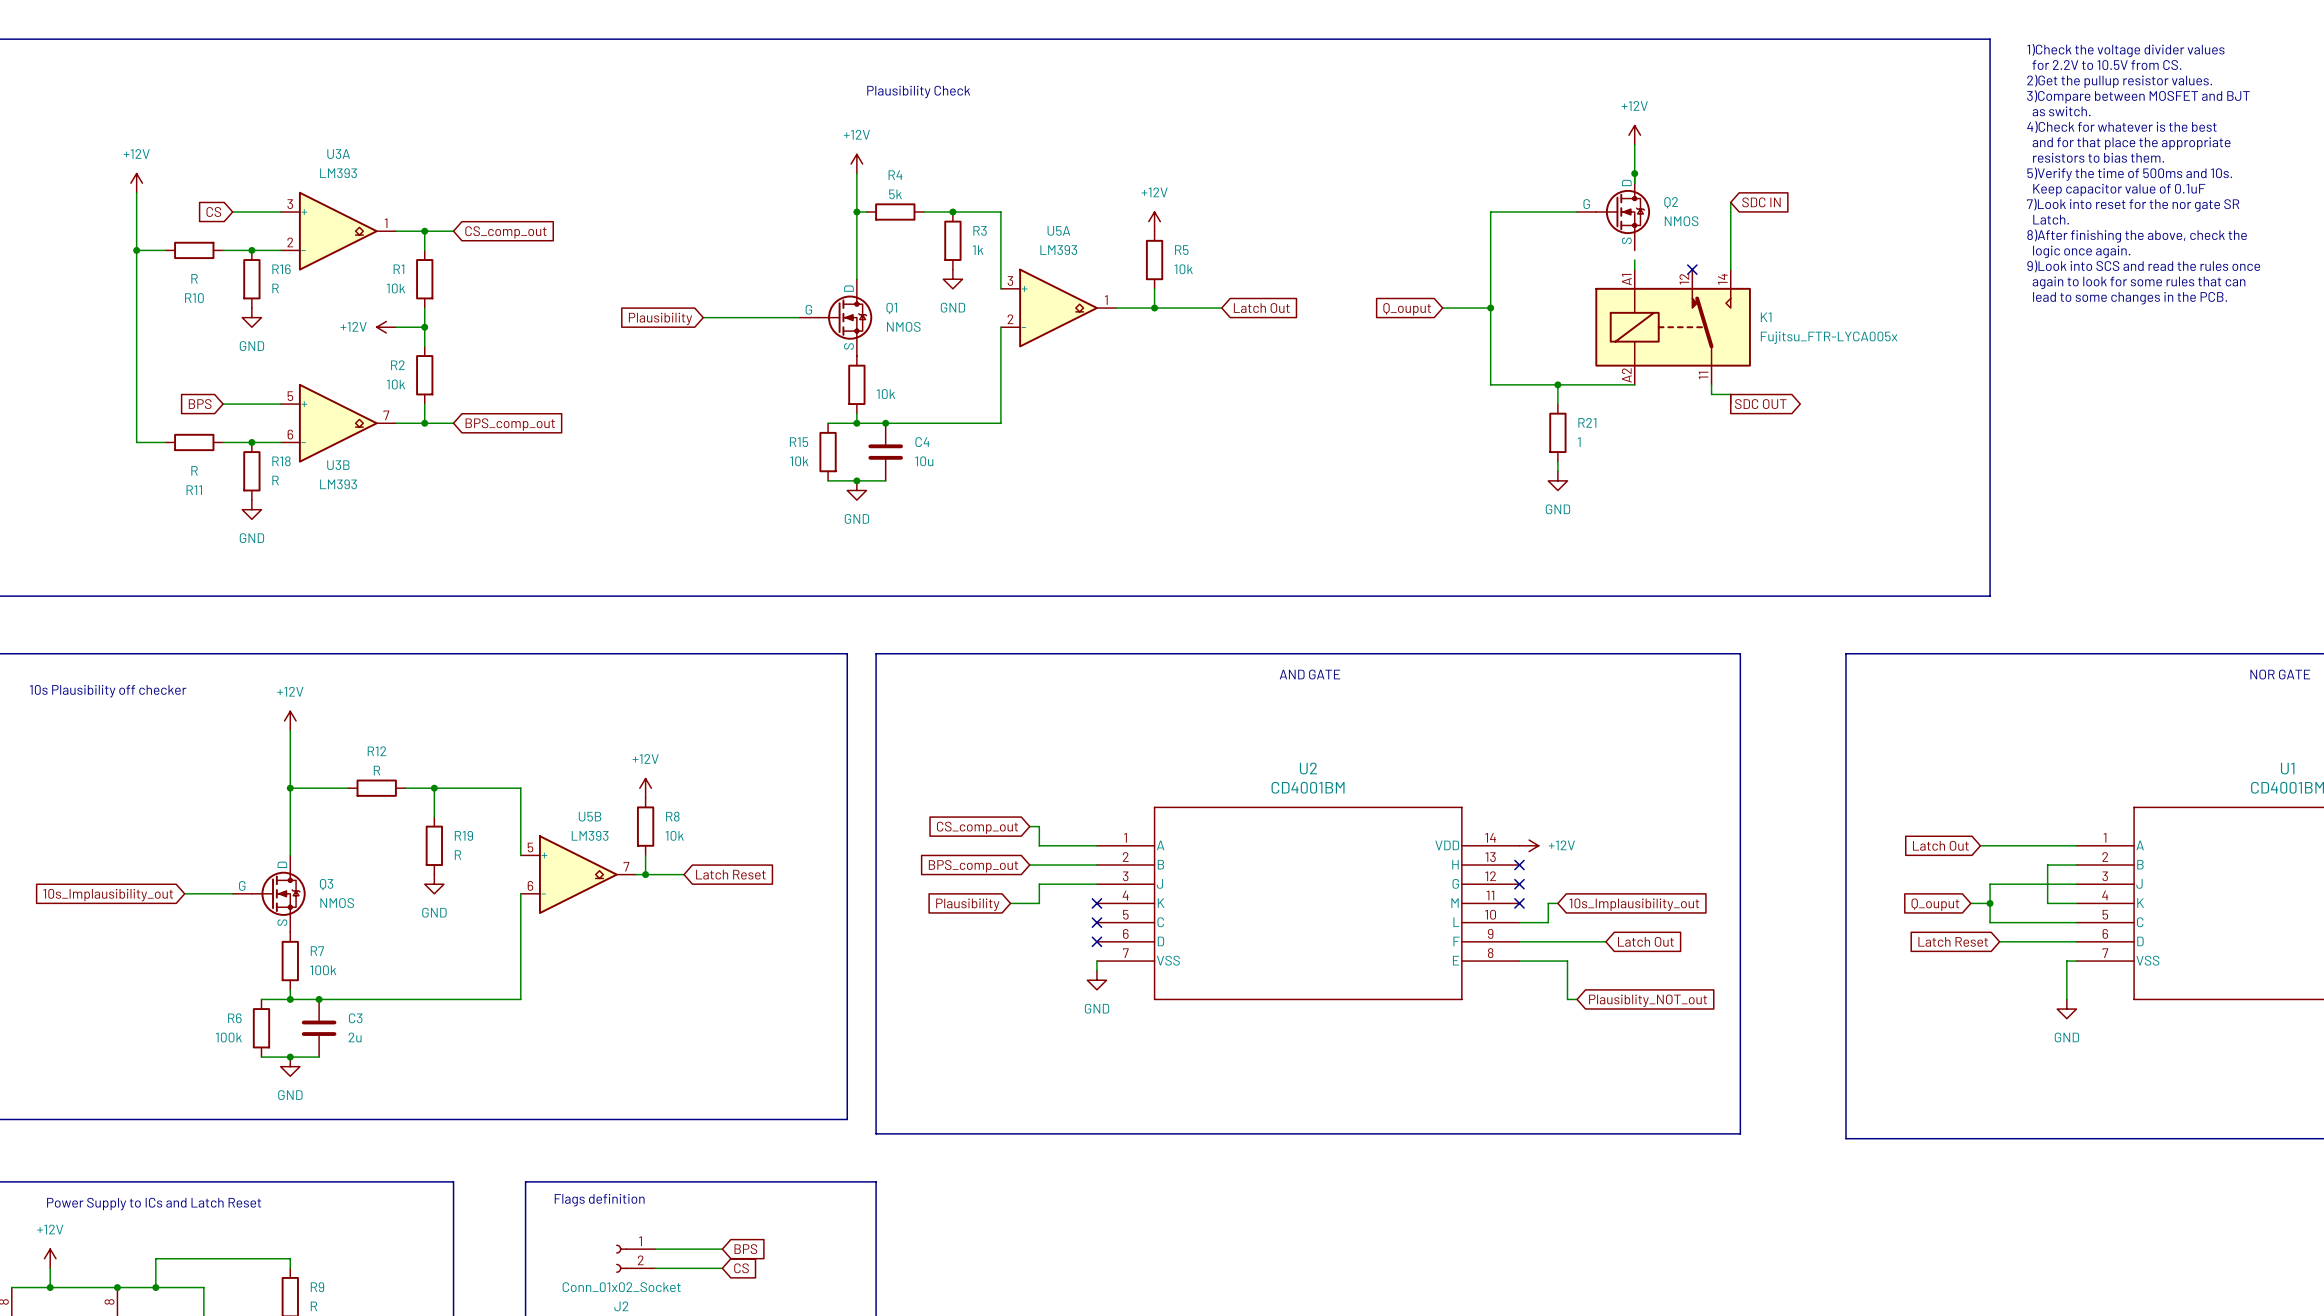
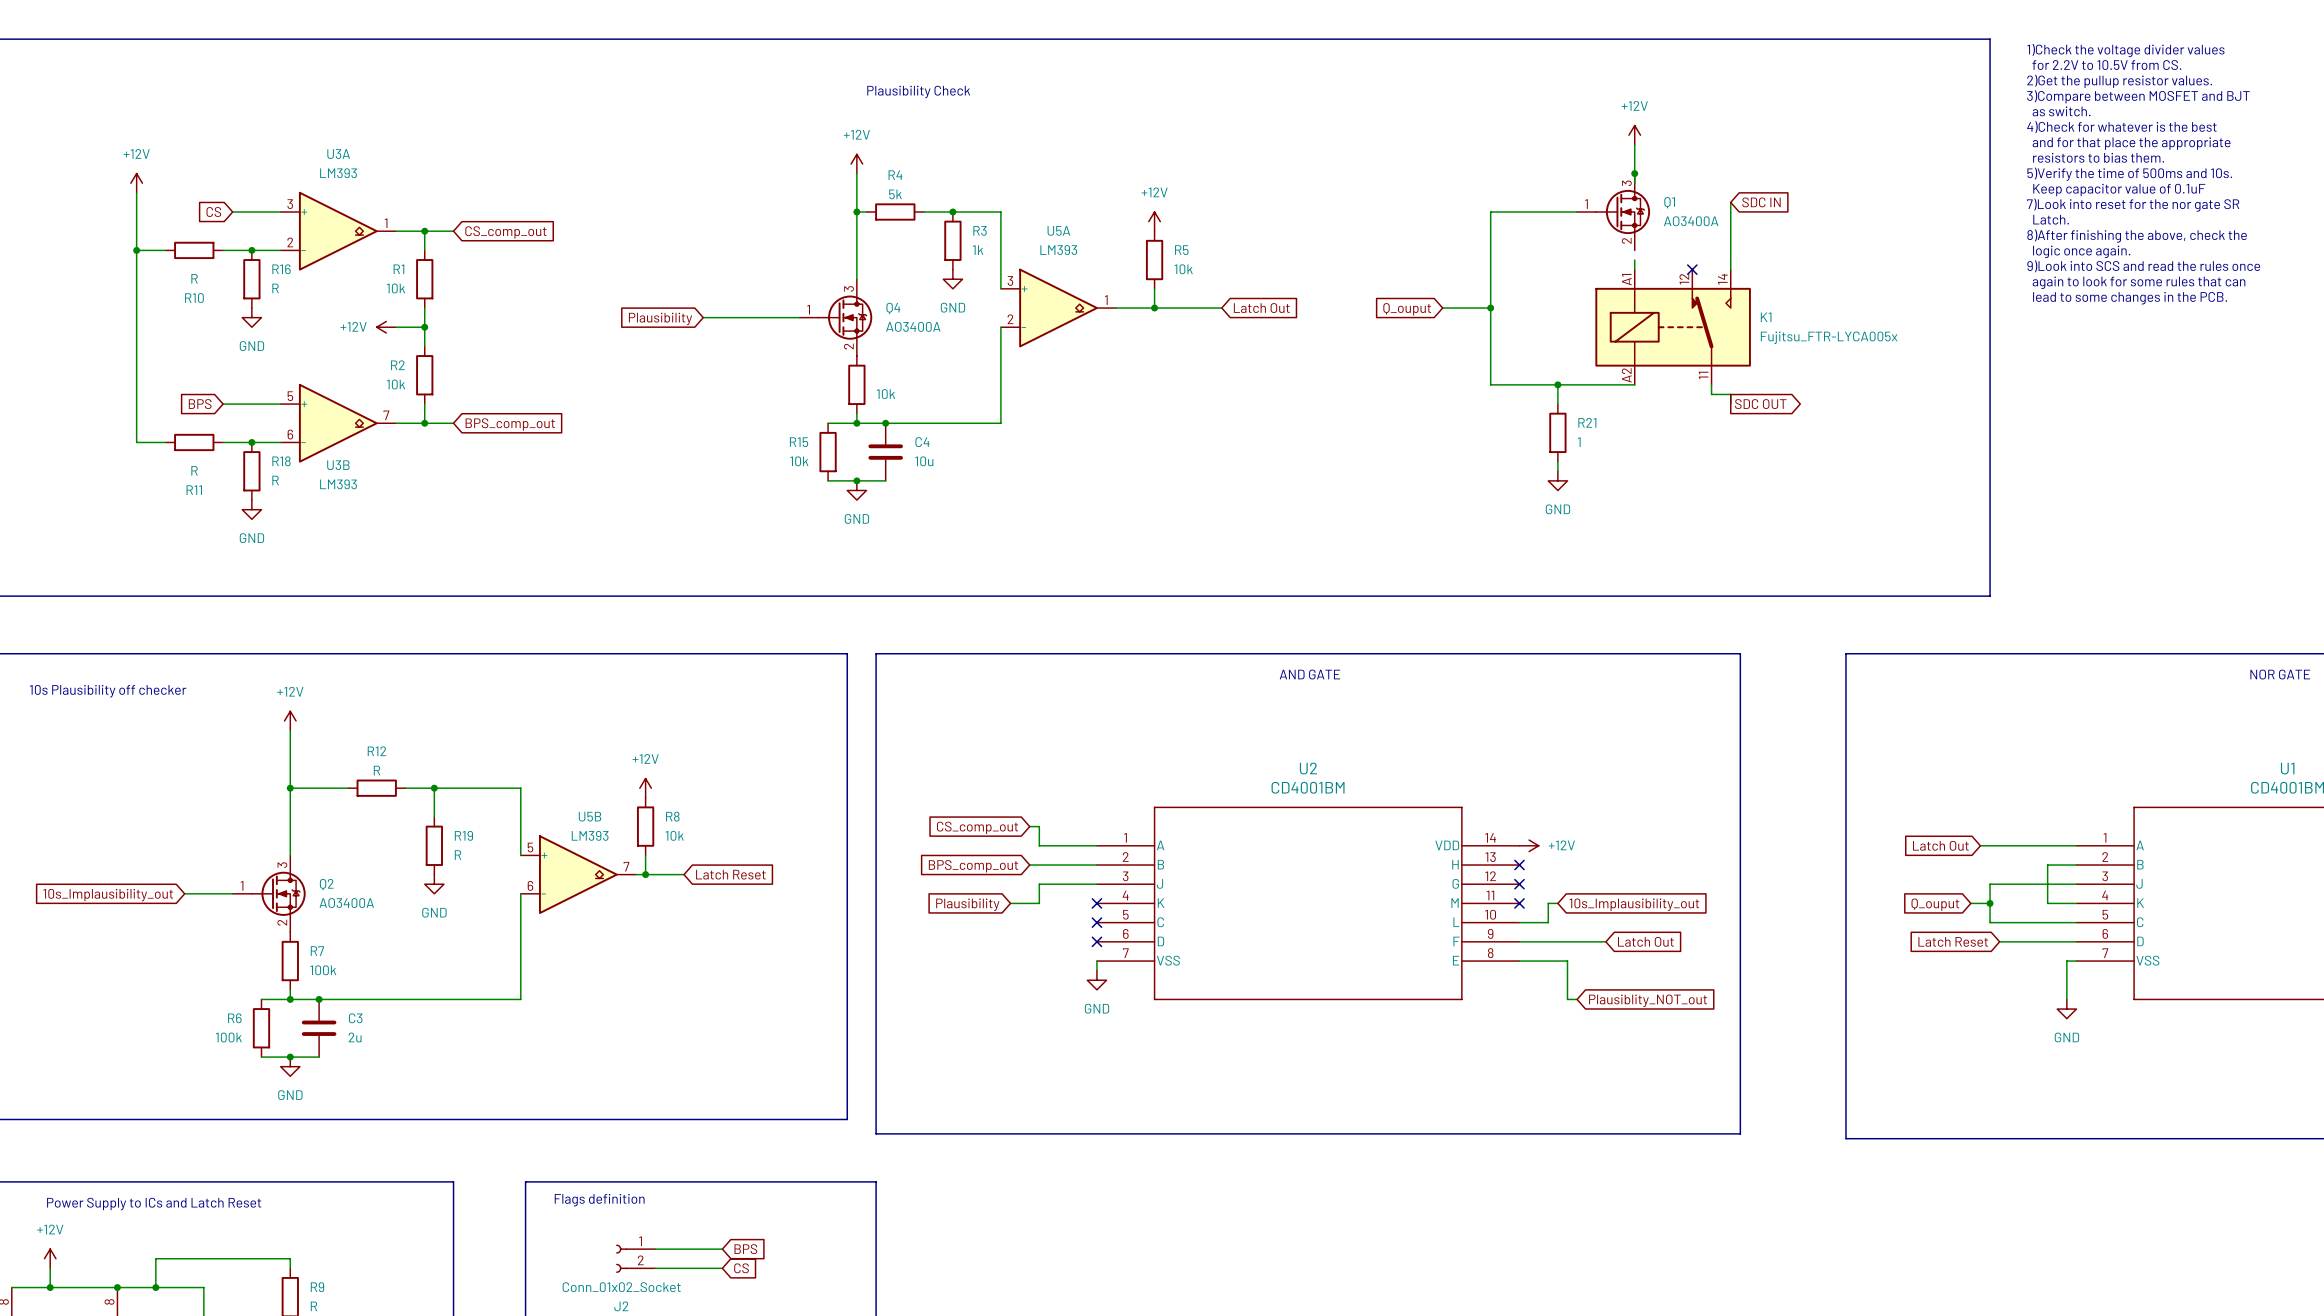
Q2 pin name: D (1626, 182) -> none
Q1 pin number: none -> 3 (1626, 183)
Q2 pin name: G (1586, 204) -> none
Q1 pin number: none -> 1 (1586, 204)
Q2 position: (1613, 212) -> (269, 893)
Q2 value: NMOS (1681, 221) -> AO3400A (346, 903)
Q2 pin name: S (1626, 240) -> none
Q1 pin number: none -> 2 (1626, 240)
Q1 pin name: D (848, 288) -> none
Q1 pin name: G (808, 309) -> none
Q1 position: (835, 317) -> (1613, 212)
Q4: none -> AO3400A (835, 317)
Q1 value: NMOS (903, 326) -> AO3400A (1691, 221)
Q1 pin name: S (848, 346) -> none
Q2 pin number: none -> 3 (282, 865)
Q2 pin number: none -> 1 (242, 885)
Q3: NMOS (269, 893) -> none
Q2 pin number: none -> 2 (282, 922)

